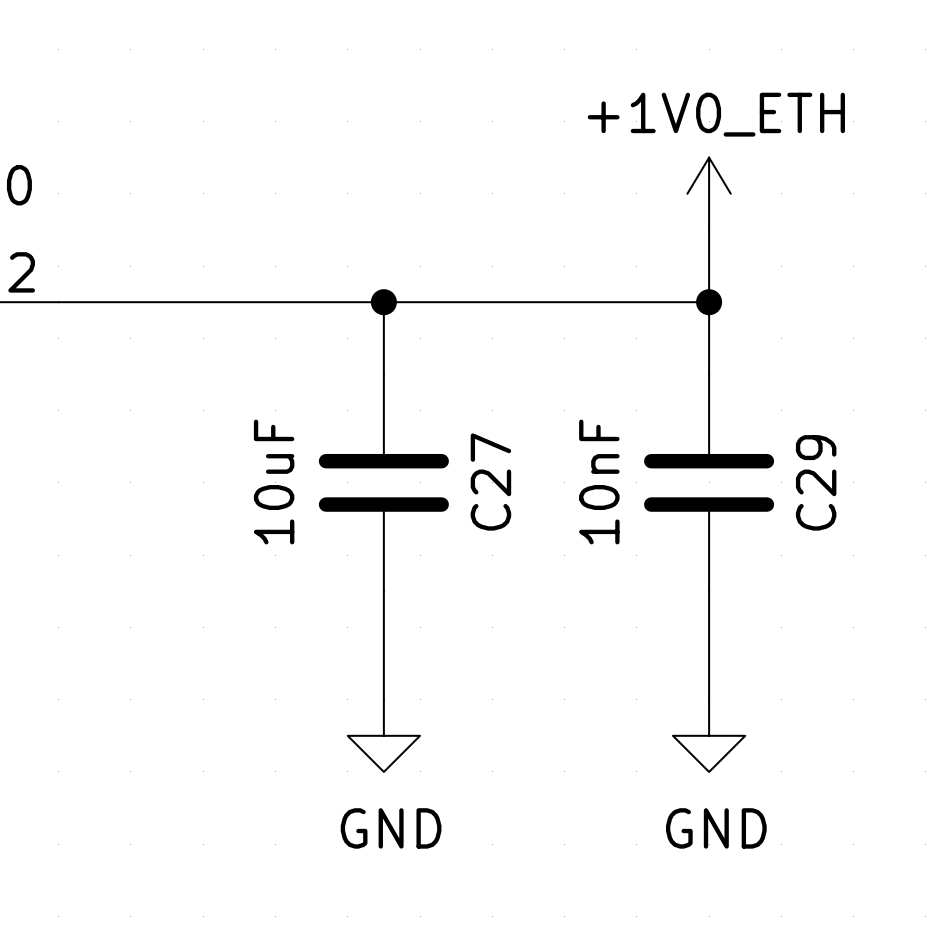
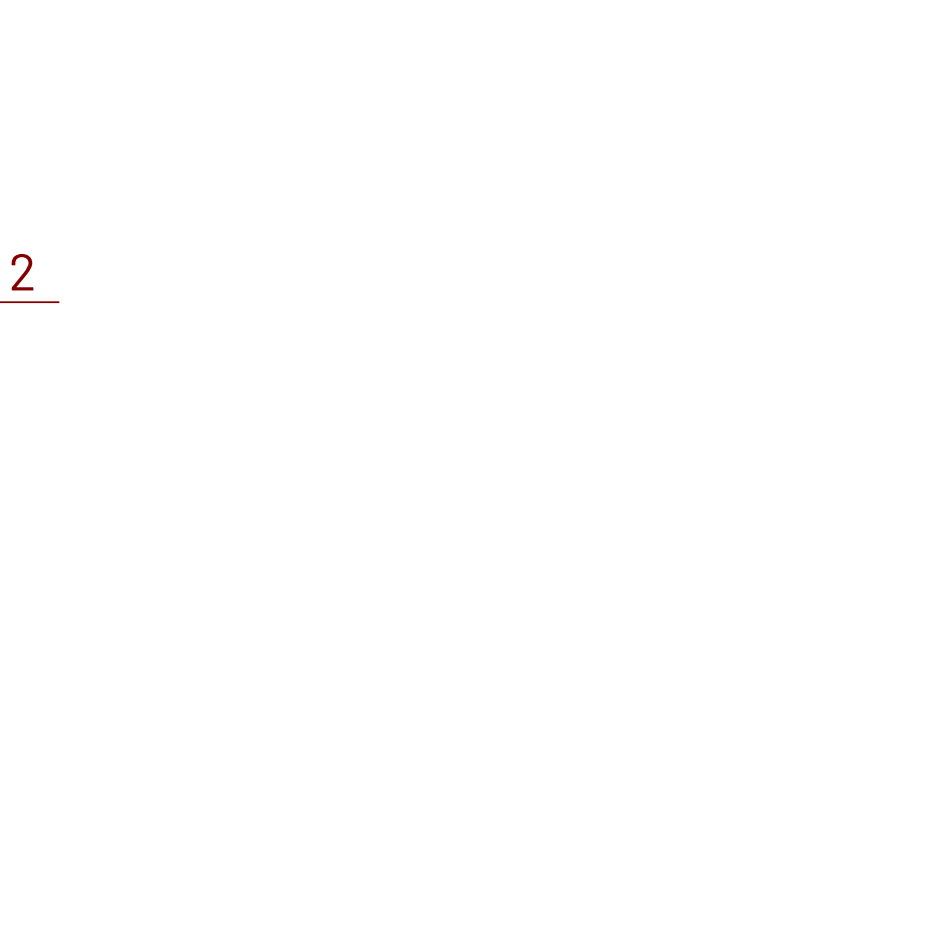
power symbol: +1V0_ETH (709, 193) -> none
wire: (709, 229) (709, 374) -> none
wire: (58, 302) (709, 302) -> none
wire: (383, 302) (383, 374) -> none
junction: (383, 302) -> none
junction: (709, 302) -> none
C27: 10uF (383, 482) -> none
C29: 10nF (709, 482) -> none
wire: (383, 591) (383, 699) -> none
wire: (709, 591) (709, 699) -> none
power symbol: GND (383, 735) -> none
power symbol: GND (709, 735) -> none

